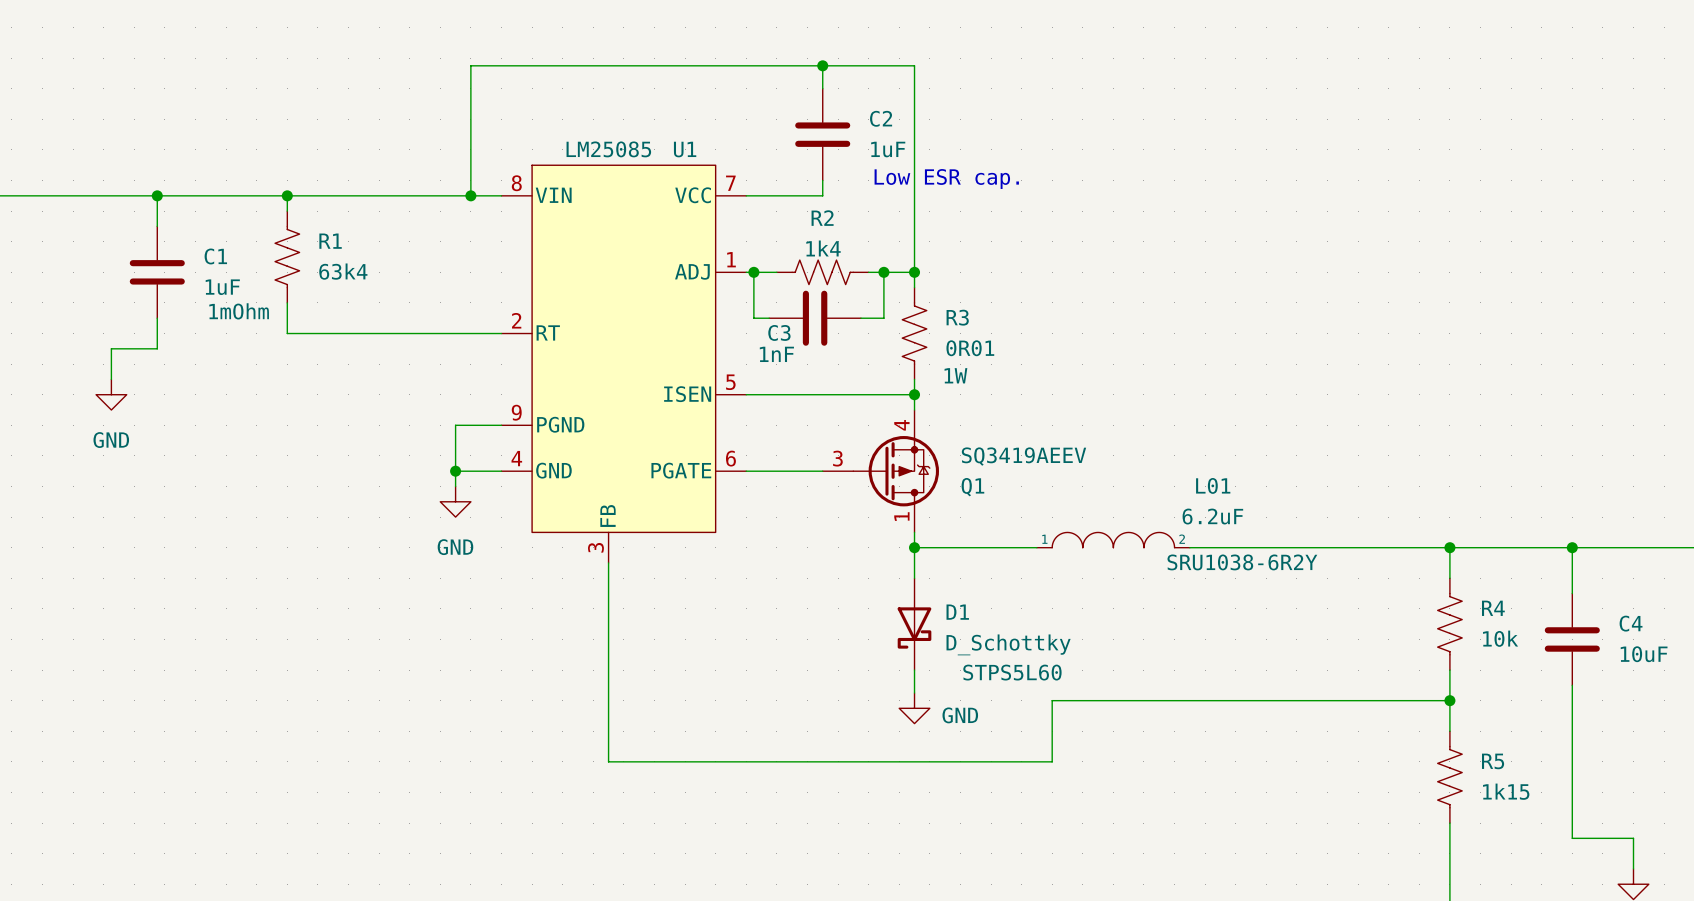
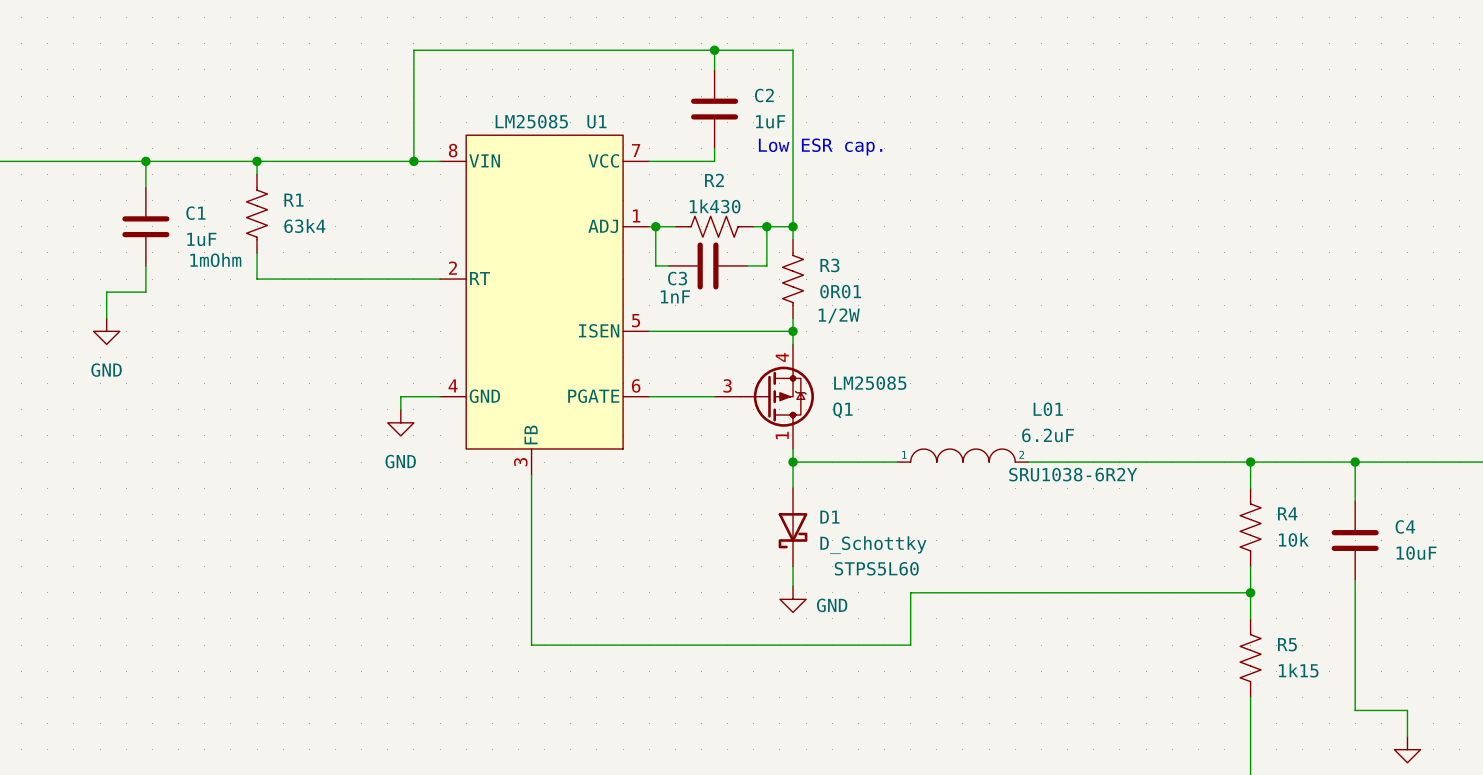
U1 symbol: [501, 165, 747, 563] -> [440, 135, 650, 476]
R2 value: 1k4 (823, 248) -> 1k430 (715, 206)
R3 text: 1W (955, 375) -> 1/2W (839, 315)
wire: (501, 425) (455, 425) (455, 471) -> none
Q1 value: SQ3419AEEV (1023, 456) -> LM25085 (870, 383)
junction: (455, 471) -> none

